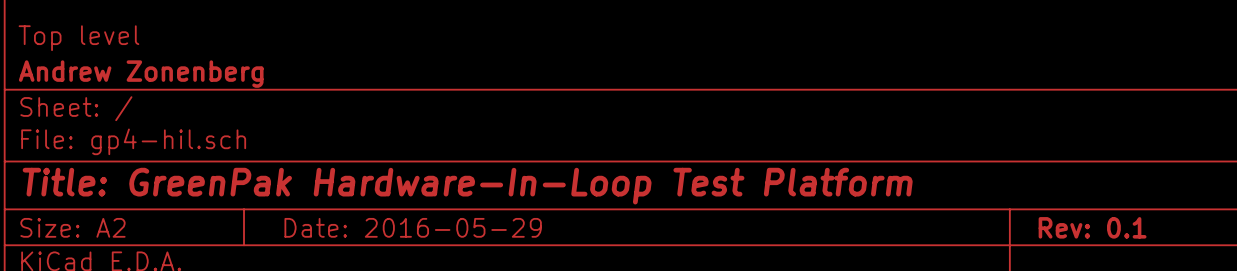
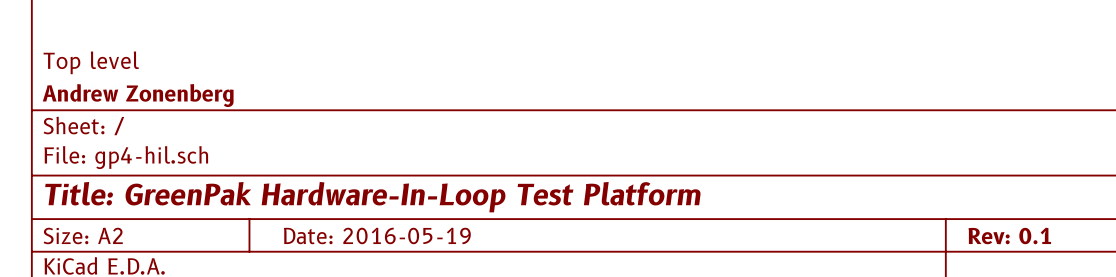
title block: Date: 2016-05-29 (413, 227) -> Date: 2016-05-19 (377, 235)

